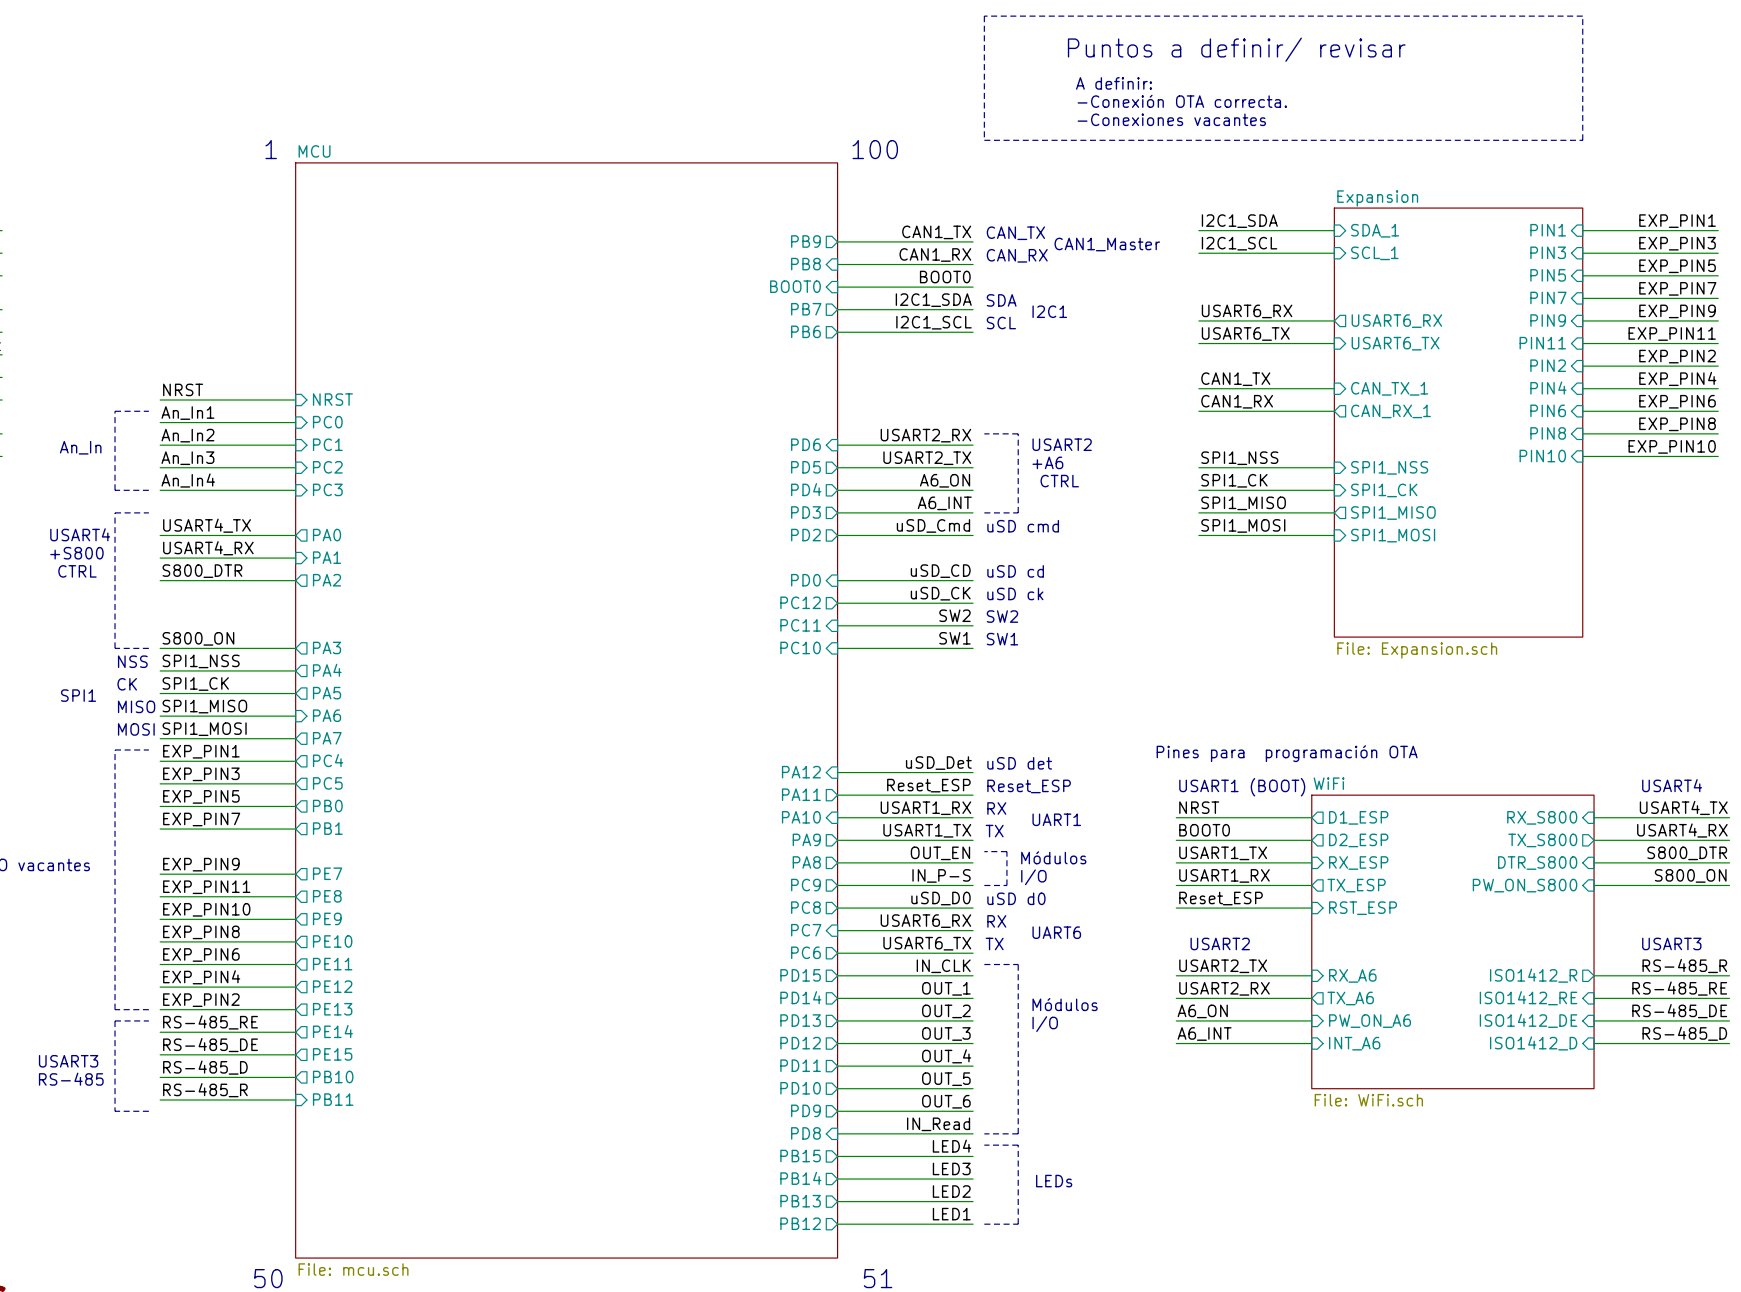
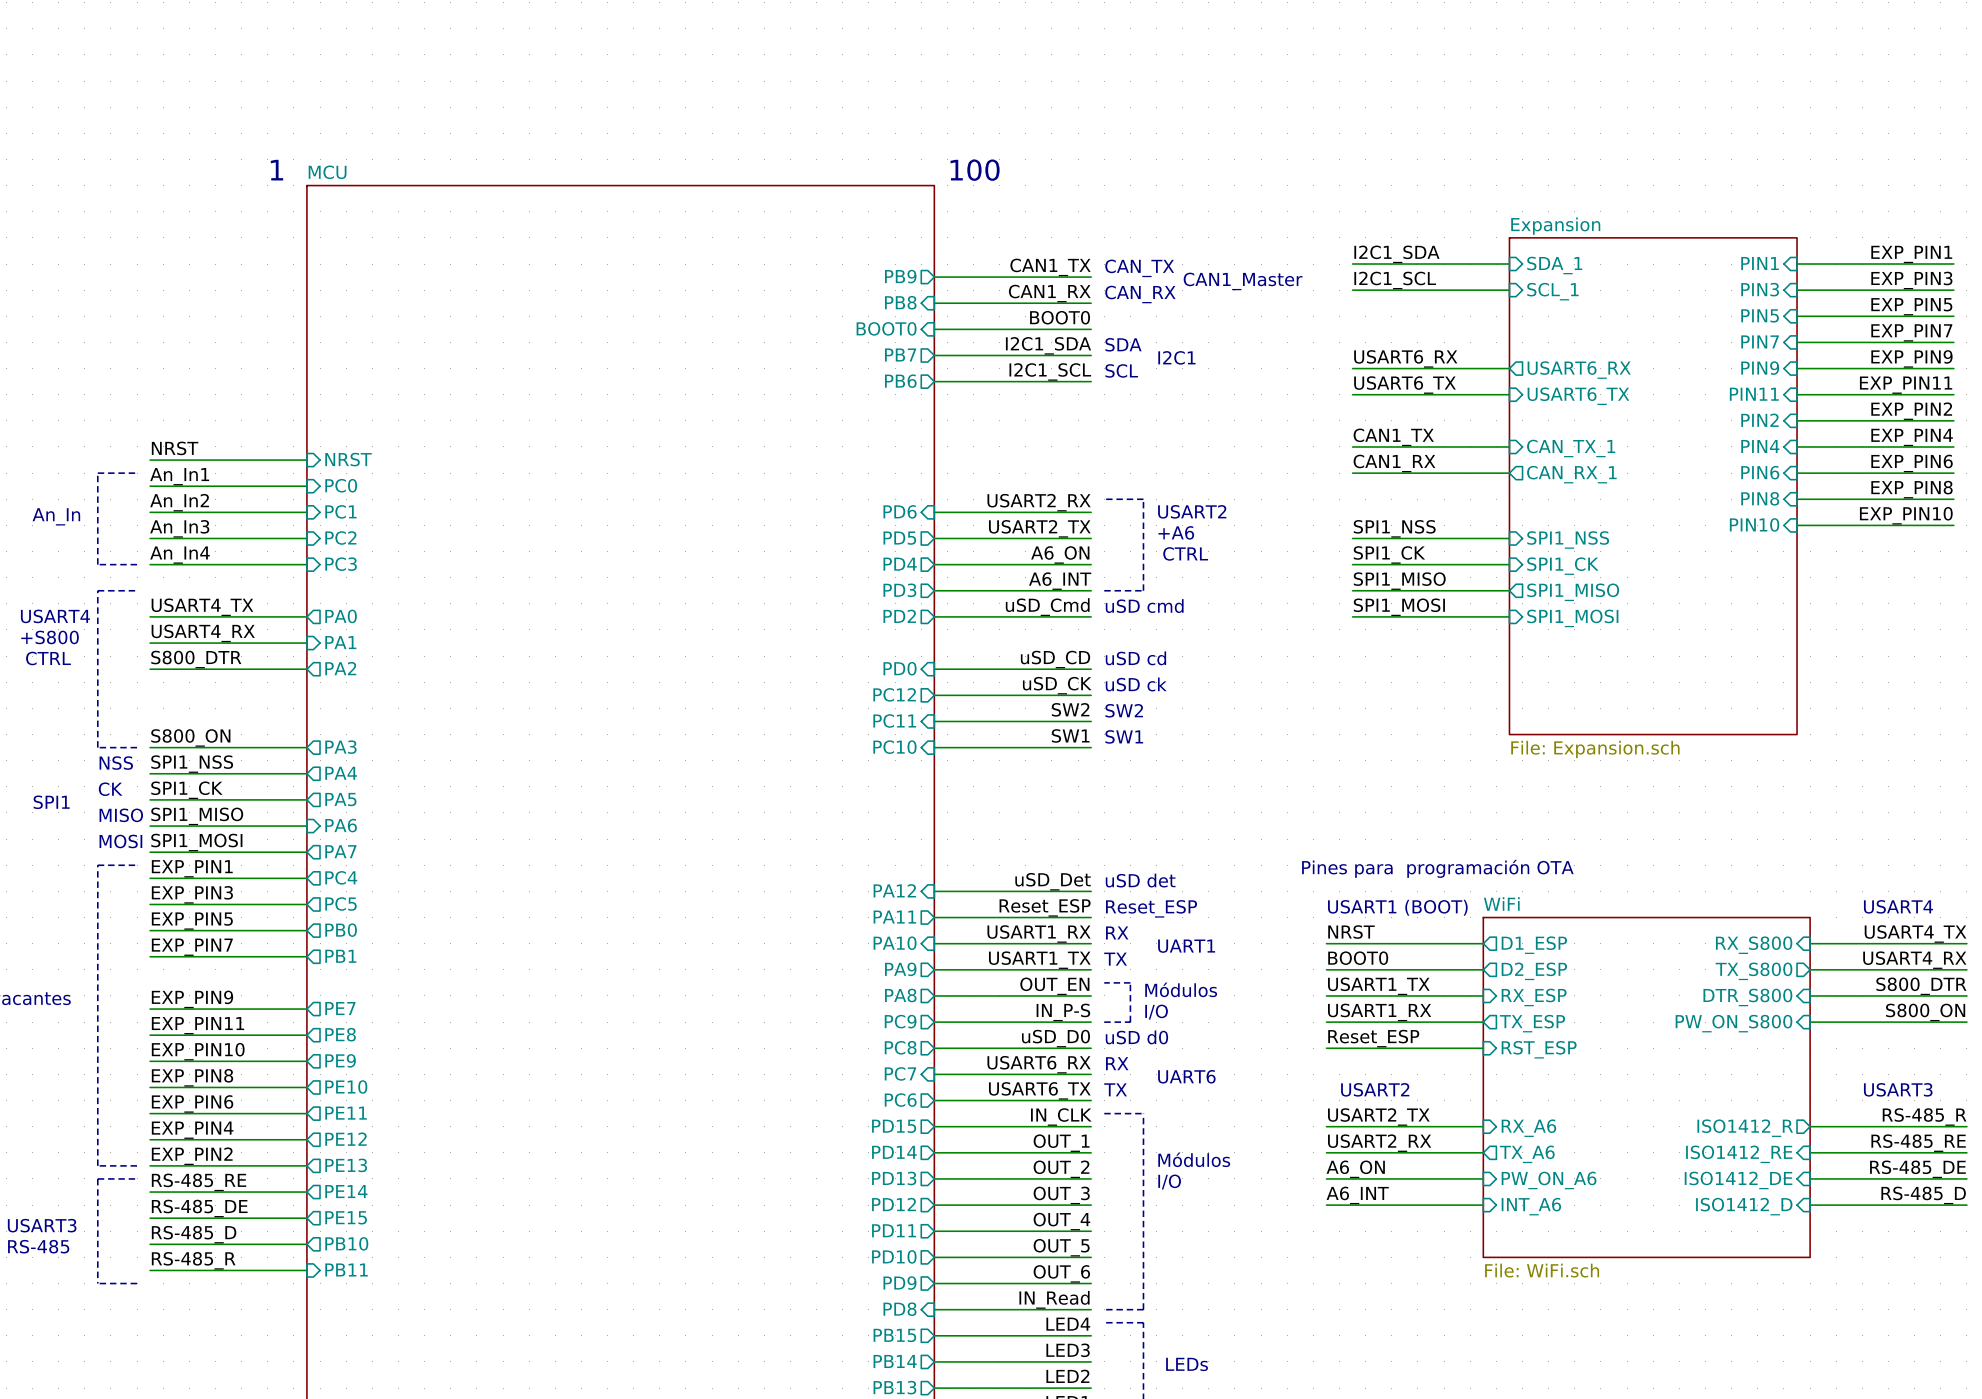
line: (984, 16) (1582, 16) (1582, 140) (984, 140) (984, 16) -> none
text: Puntos a definir/ revisar (1236, 49) -> none
text: A definir: (1114, 83) -> none
text: -Conexión OTA correcta. (1182, 101) -> none
text: -Conexiones vacantes (1171, 119) -> none

